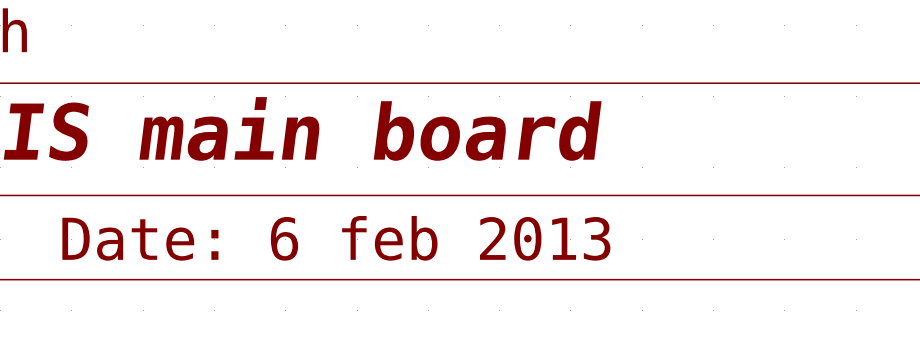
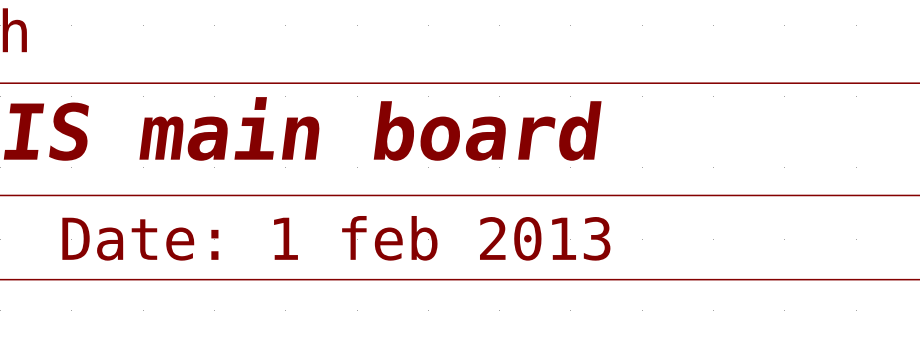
title block: Date: 6 feb 2013 (336, 238) -> Date: 1 feb 2013 (336, 238)

